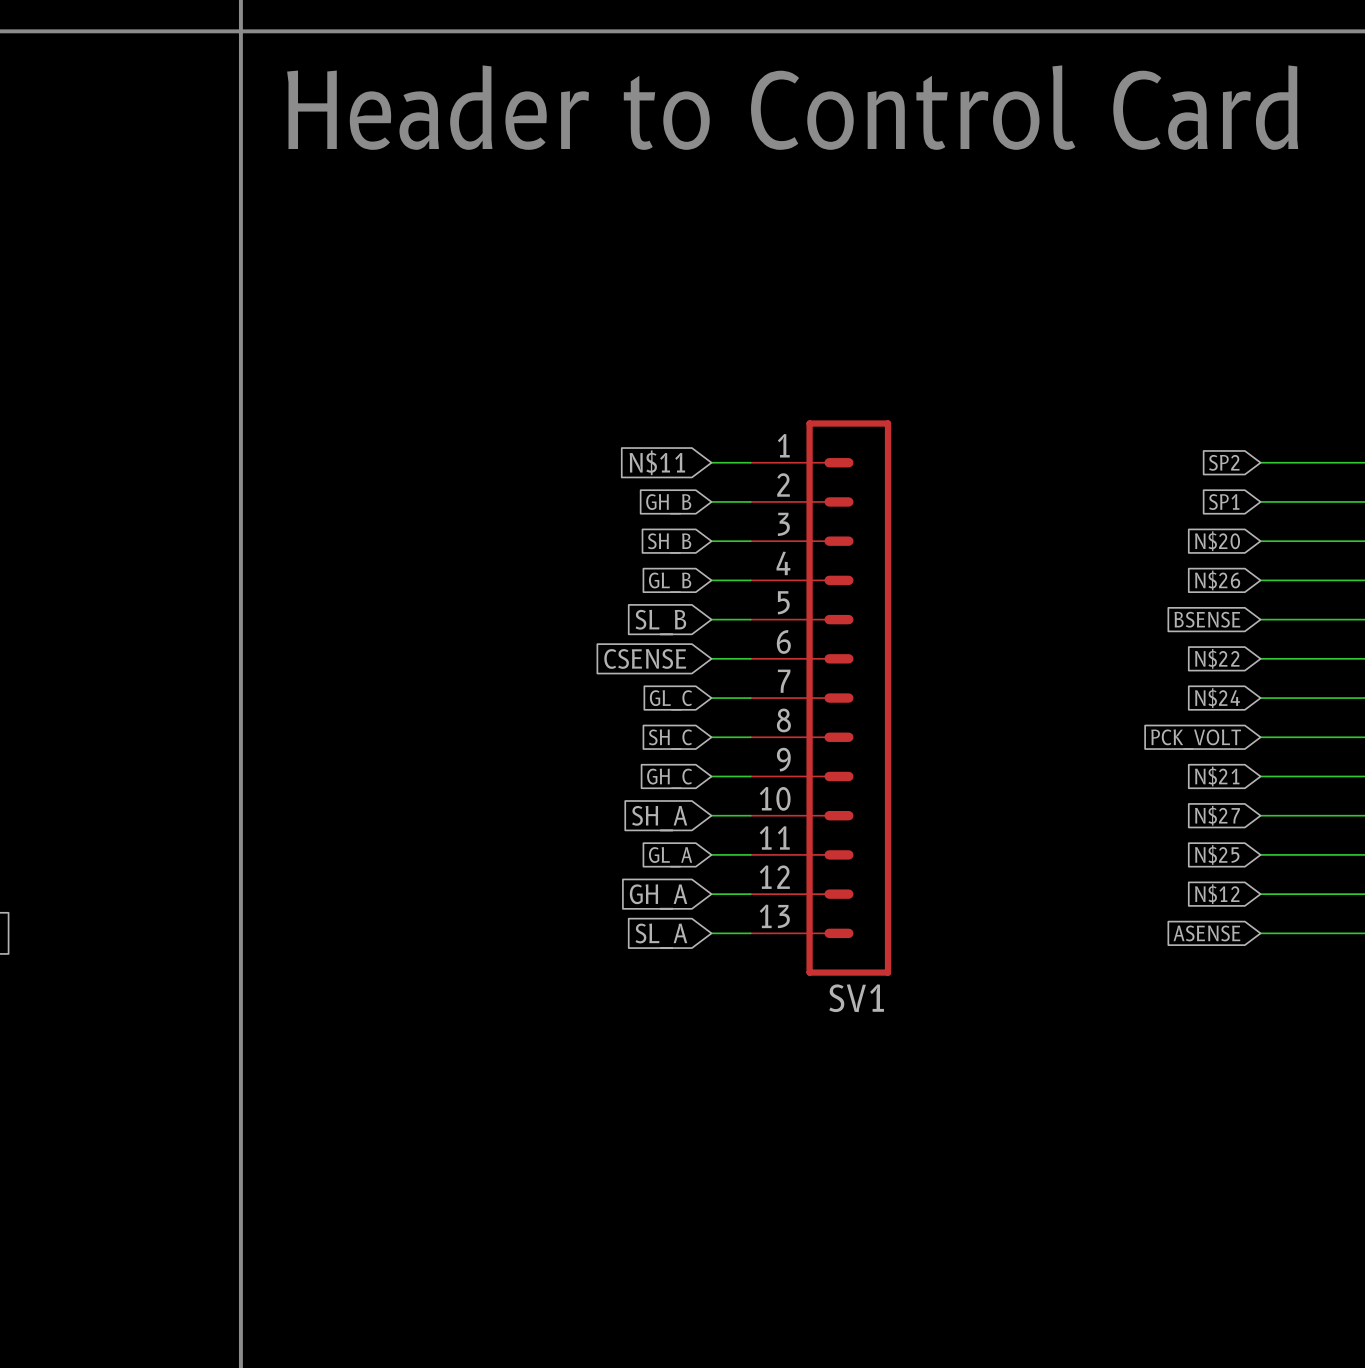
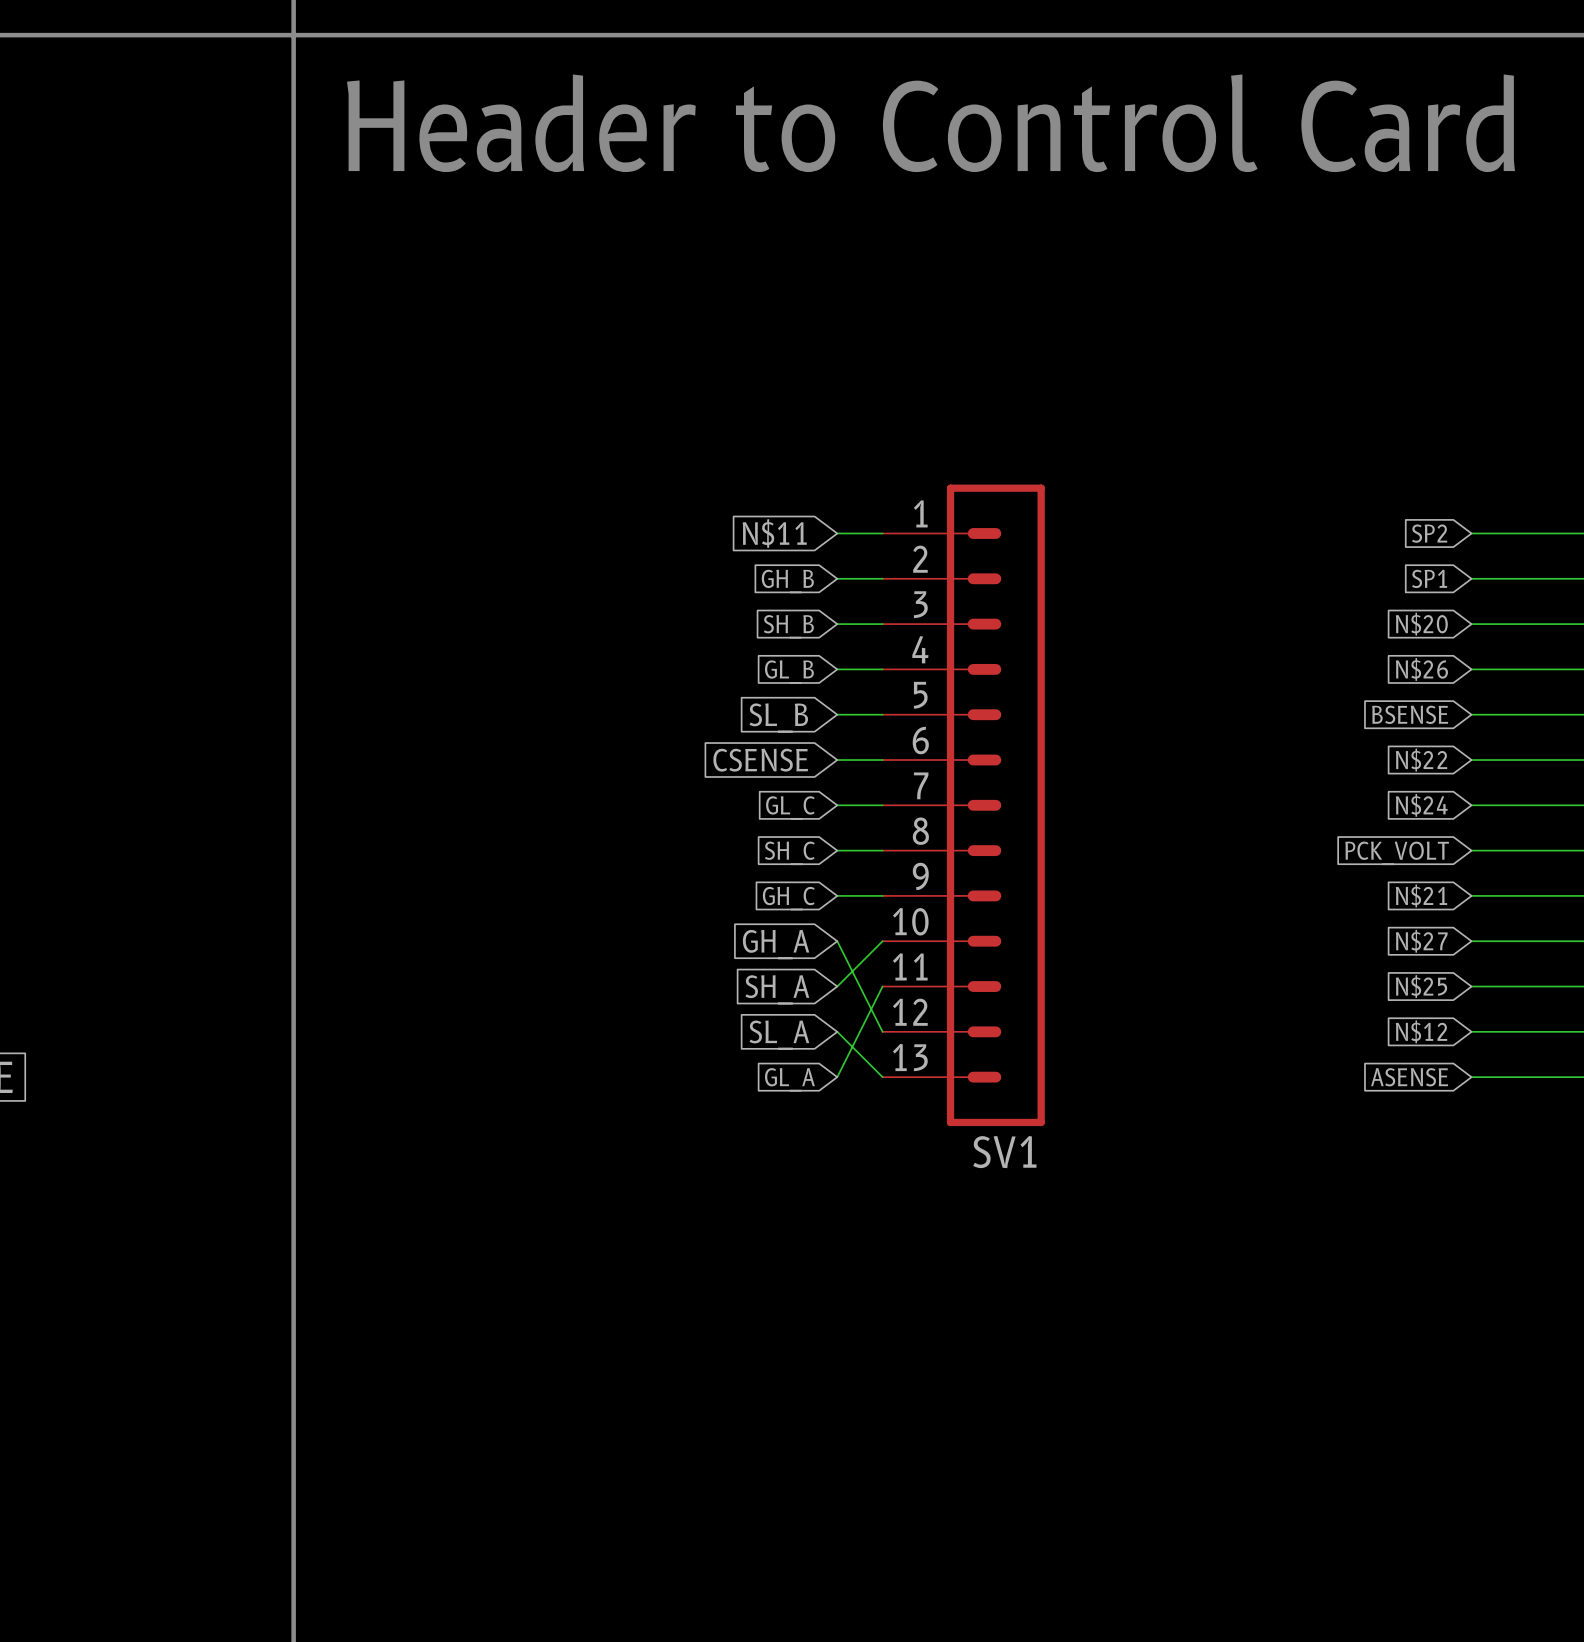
wire: (711, 815) (750, 815) -> (837, 986) (882, 941)
wire: none -> (837, 941) (882, 1031)
global label: SH_A (659, 818) -> GH_A (776, 944)
wire: (711, 854) (750, 854) -> (837, 1077) (882, 986)
global label: GL_A (670, 857) -> SH_A (777, 989)
wire: (711, 894) (750, 894) -> (837, 1031) (882, 1077)
global label: GH_A (658, 897) -> SL_A (779, 1035)
wire: (711, 933) (750, 933) -> none
global label: SL_A (661, 936) -> GL_A (789, 1079)

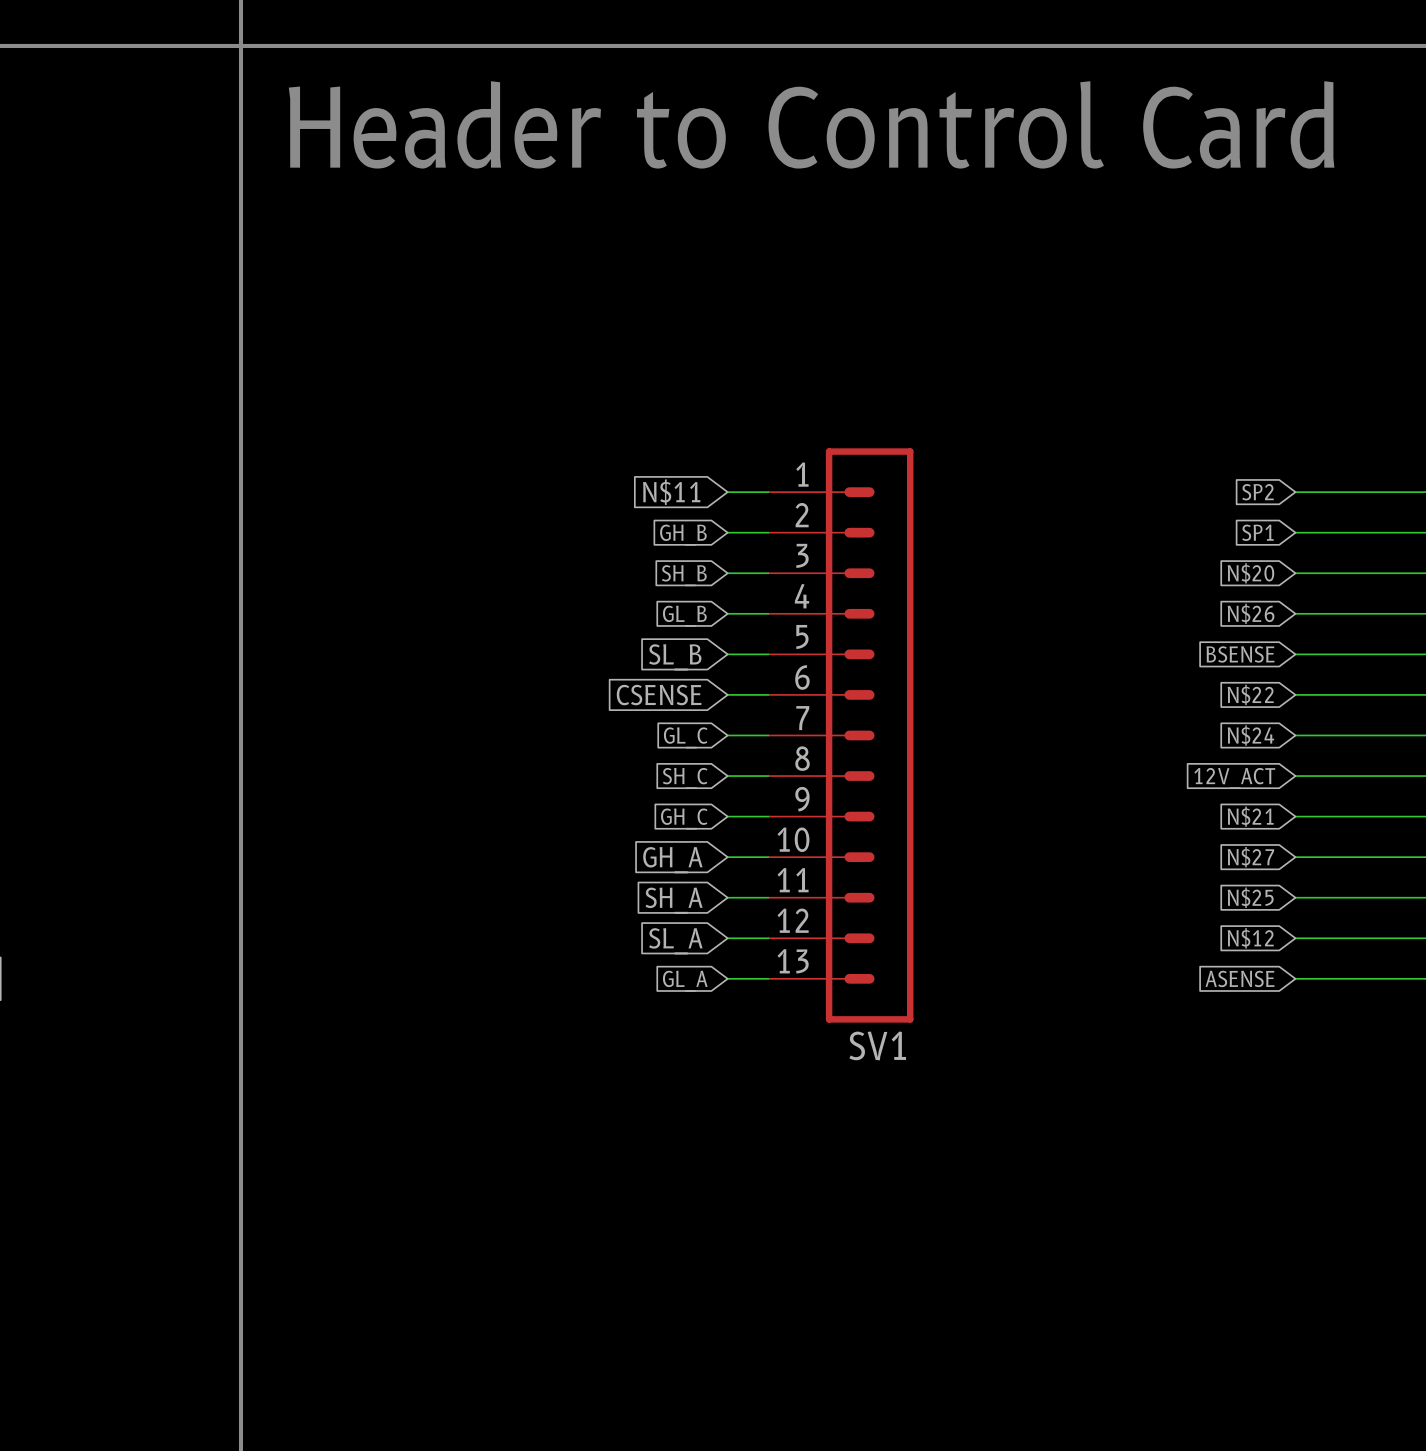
global label: PCK_VOLT (1397, 853) -> 12V_ACT (1234, 778)
wire: (837, 941) (882, 1031) -> none
wire: (882, 941) (837, 986) -> (768, 857) (727, 857)
wire: (882, 986) (837, 1077) -> (768, 897) (727, 897)
wire: (837, 1031) (882, 1077) -> (727, 938) (768, 938)
wire: none -> (727, 978) (768, 978)

